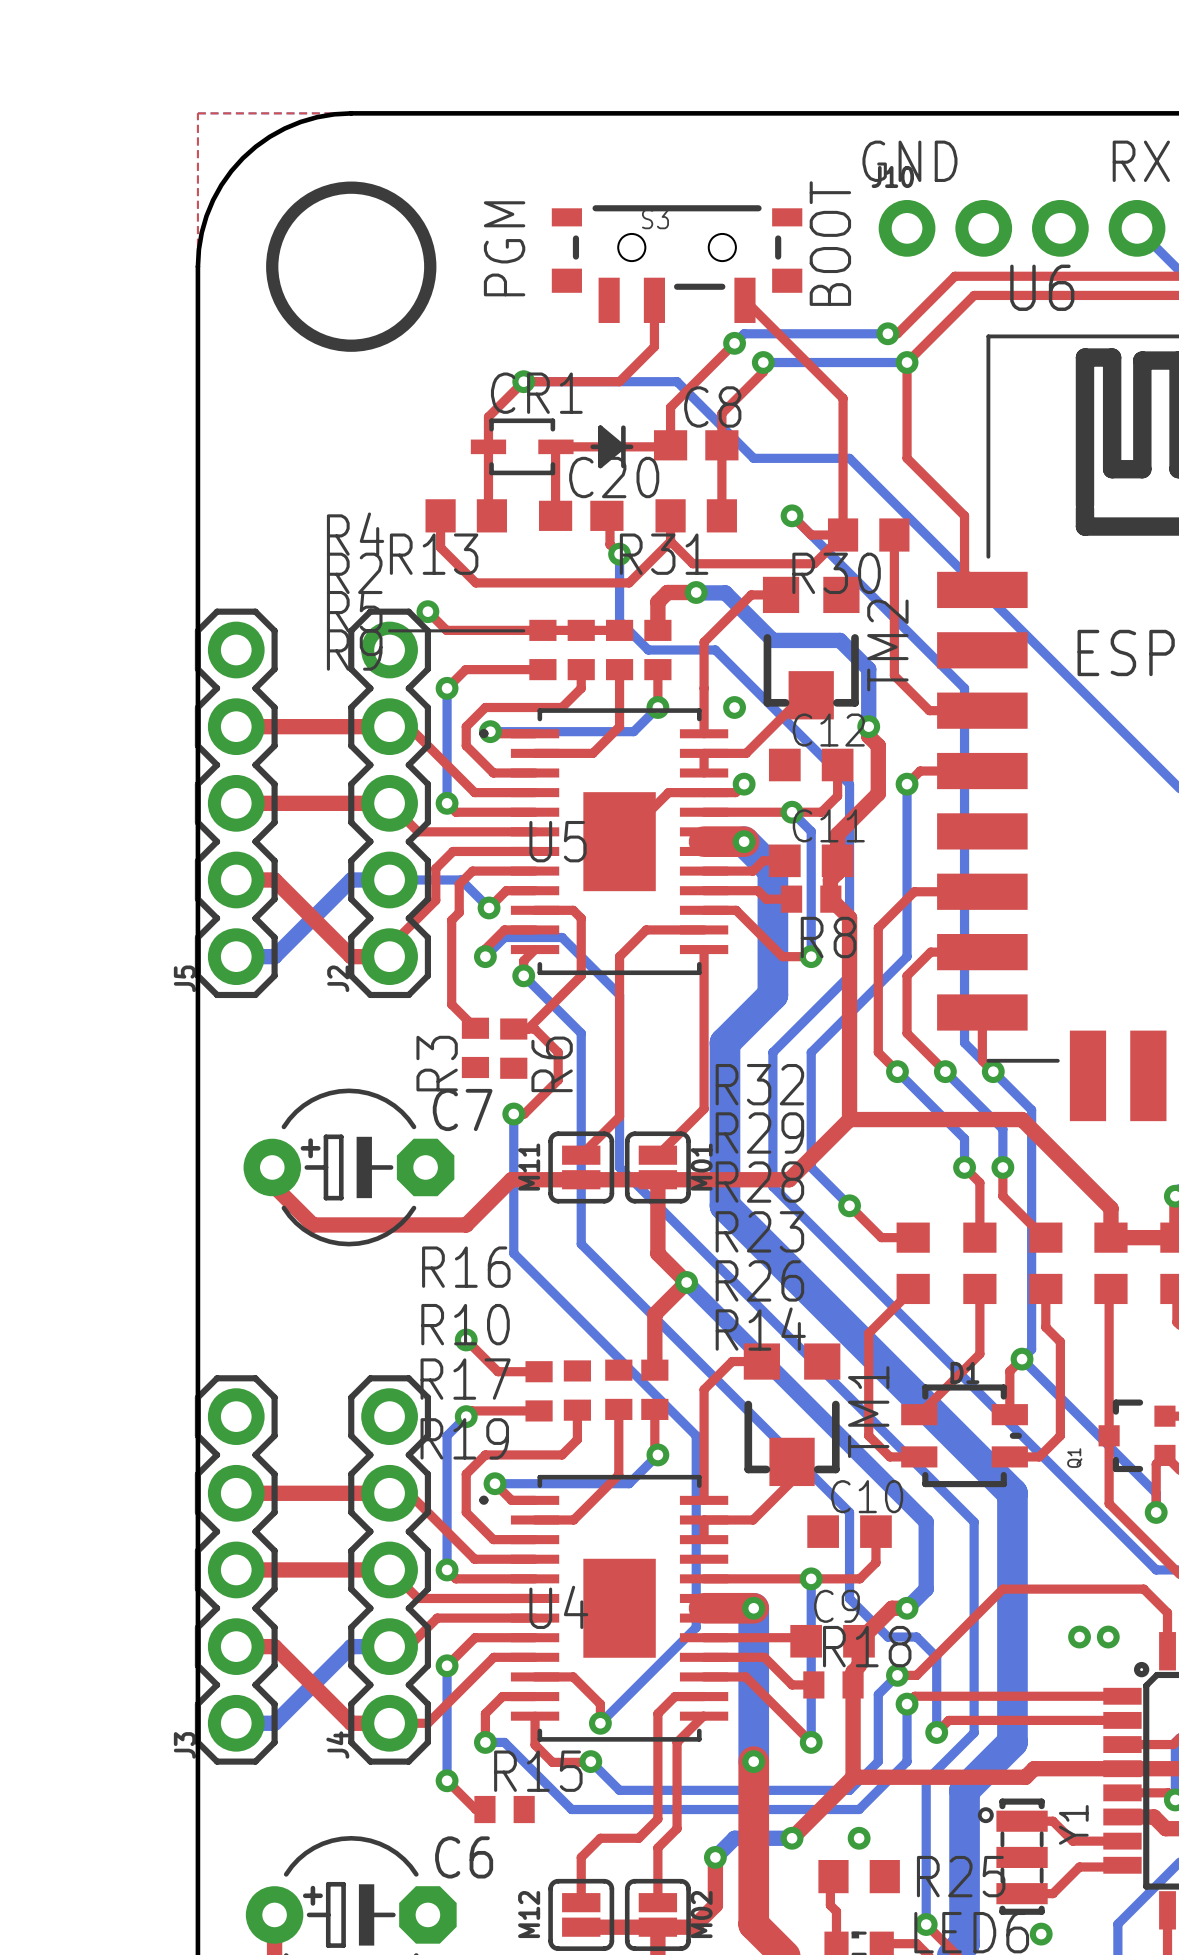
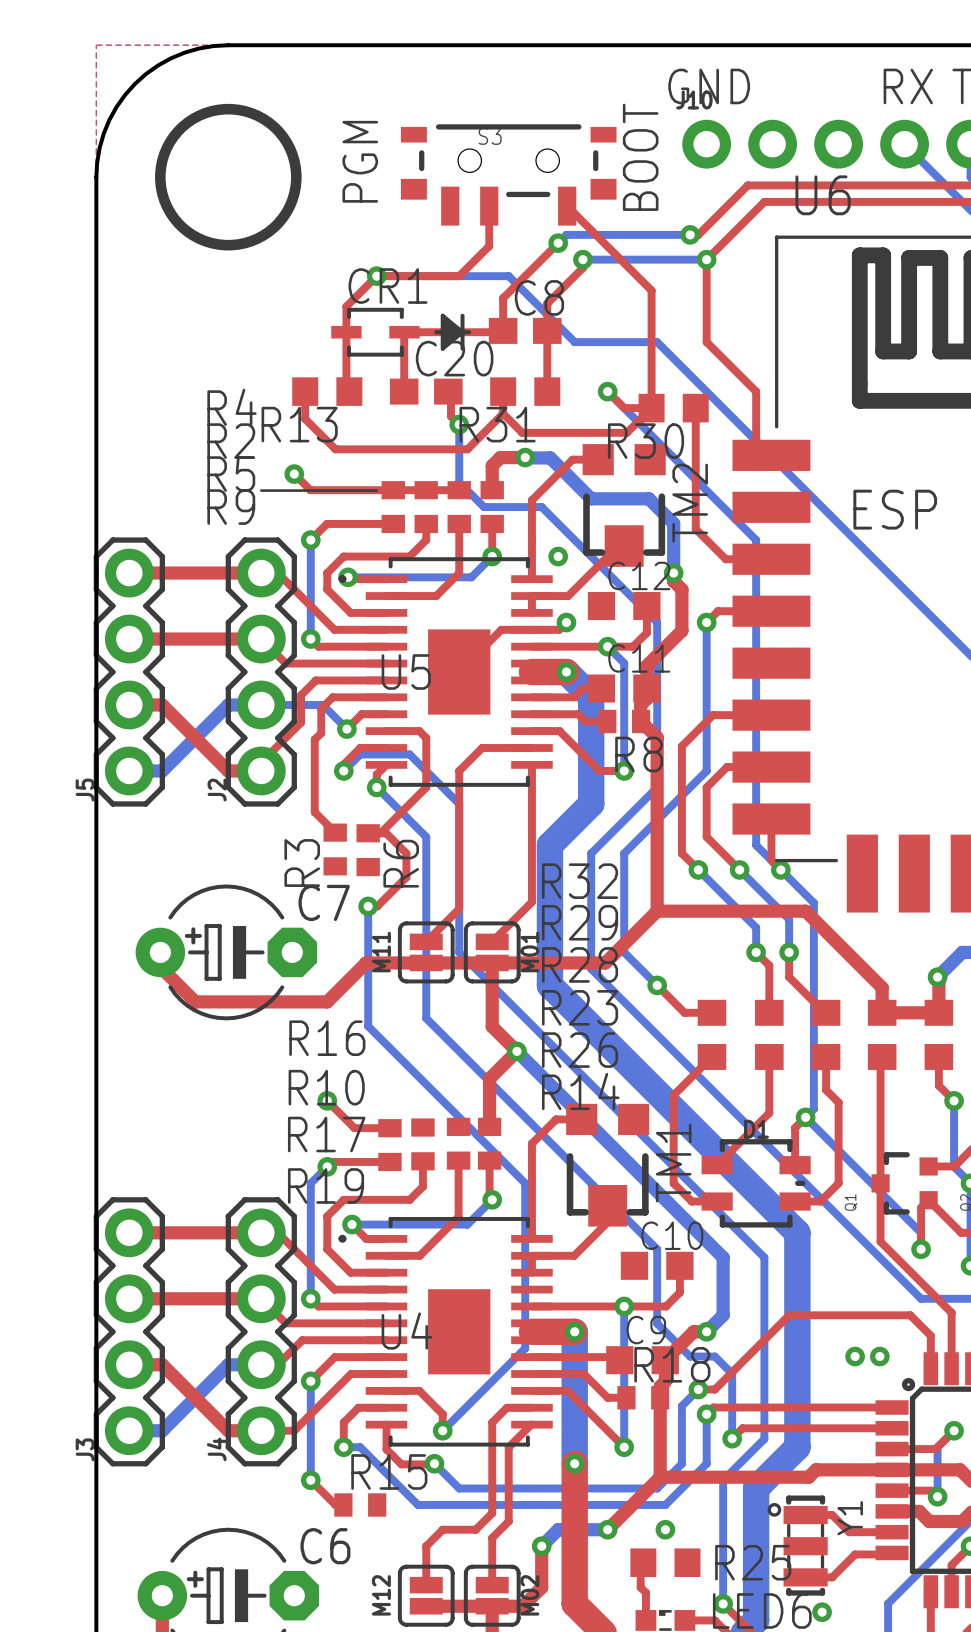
J5 footprint: [194, 608, 278, 999] -> [93, 537, 165, 807]
J2 footprint: [348, 608, 431, 999] -> [225, 537, 297, 807]
J3 footprint: [194, 1375, 278, 1765] -> [93, 1197, 165, 1467]
J4 footprint: [348, 1375, 431, 1765] -> [225, 1197, 297, 1467]

